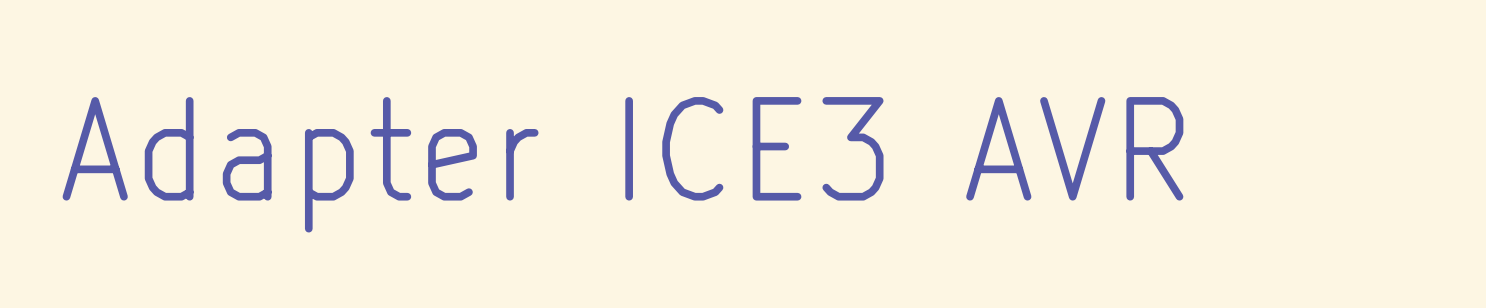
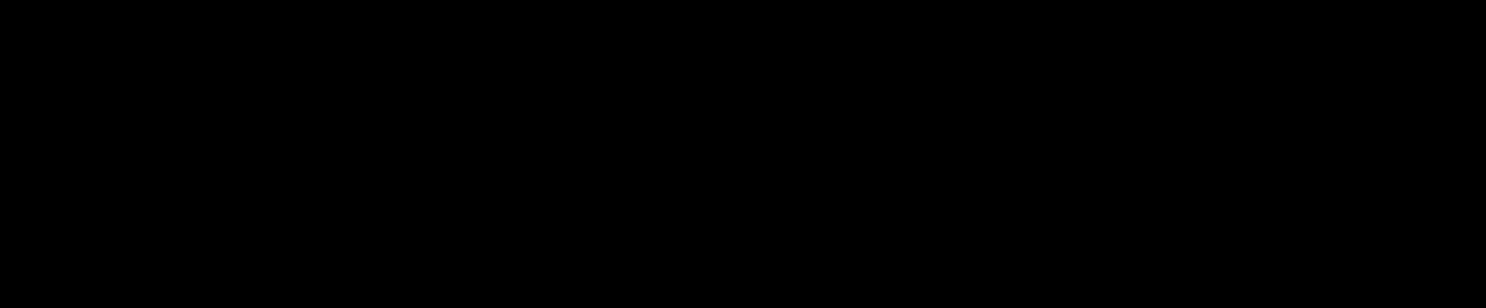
text: Adapter ICE3 AVR (622, 164) -> none

